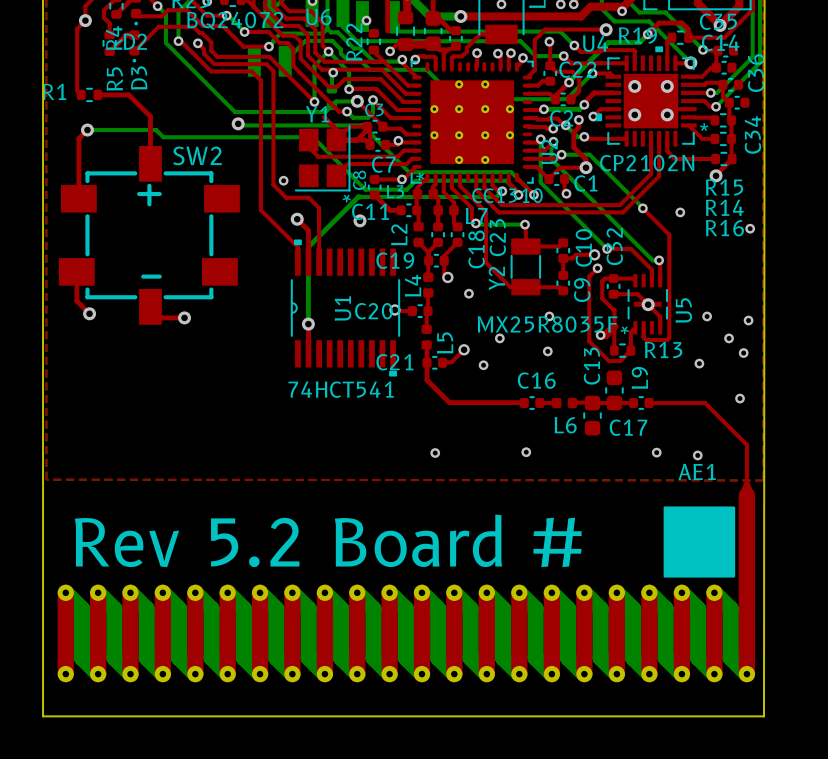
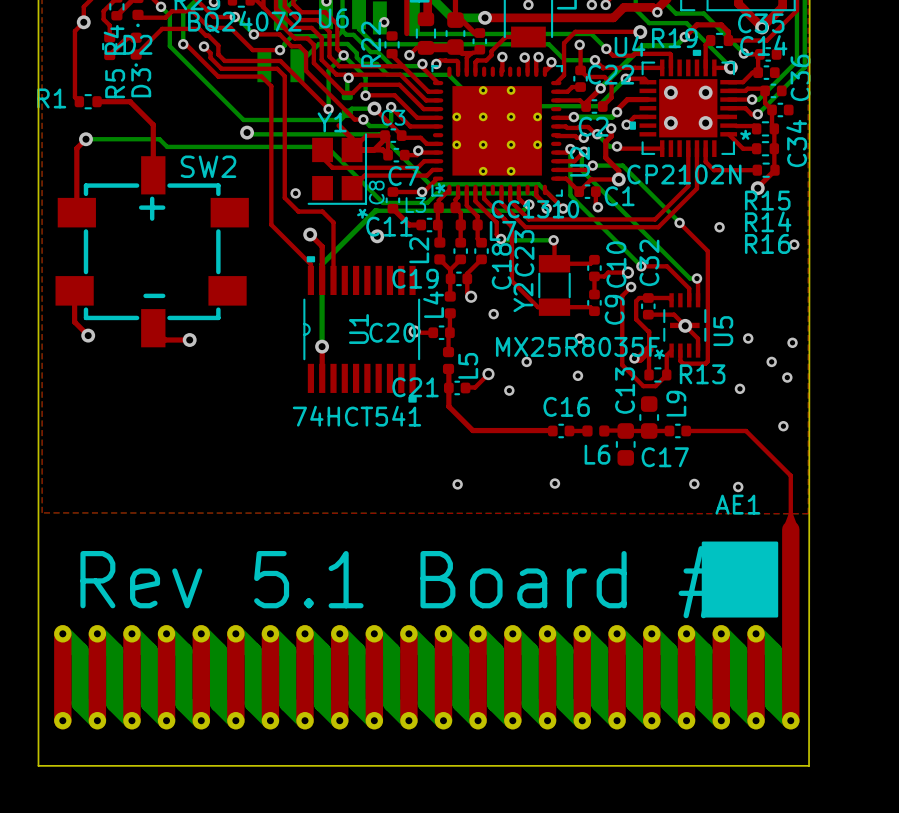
text: Rev 5.2 Board # (328, 540) -> Rev 5.1 Board # (403, 582)

